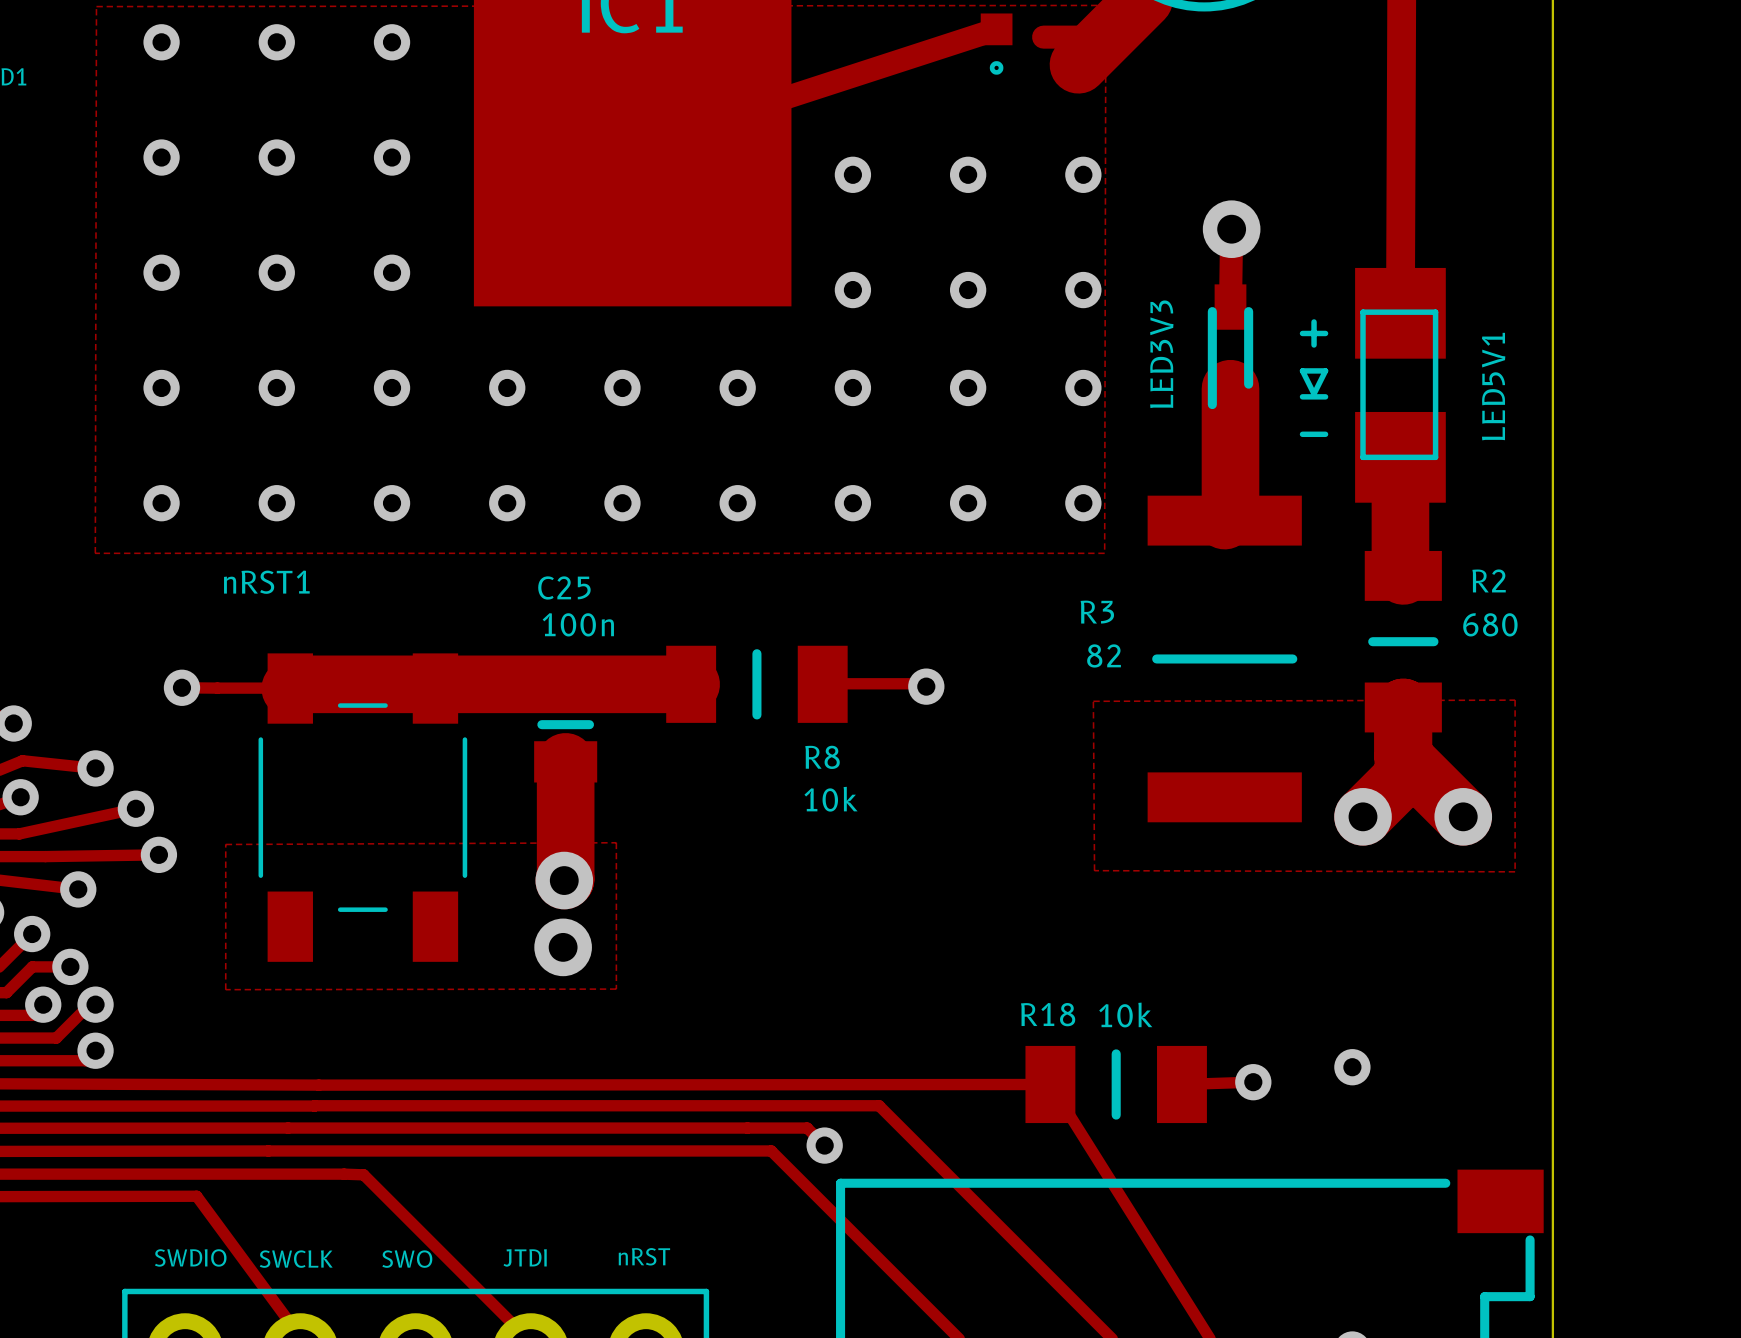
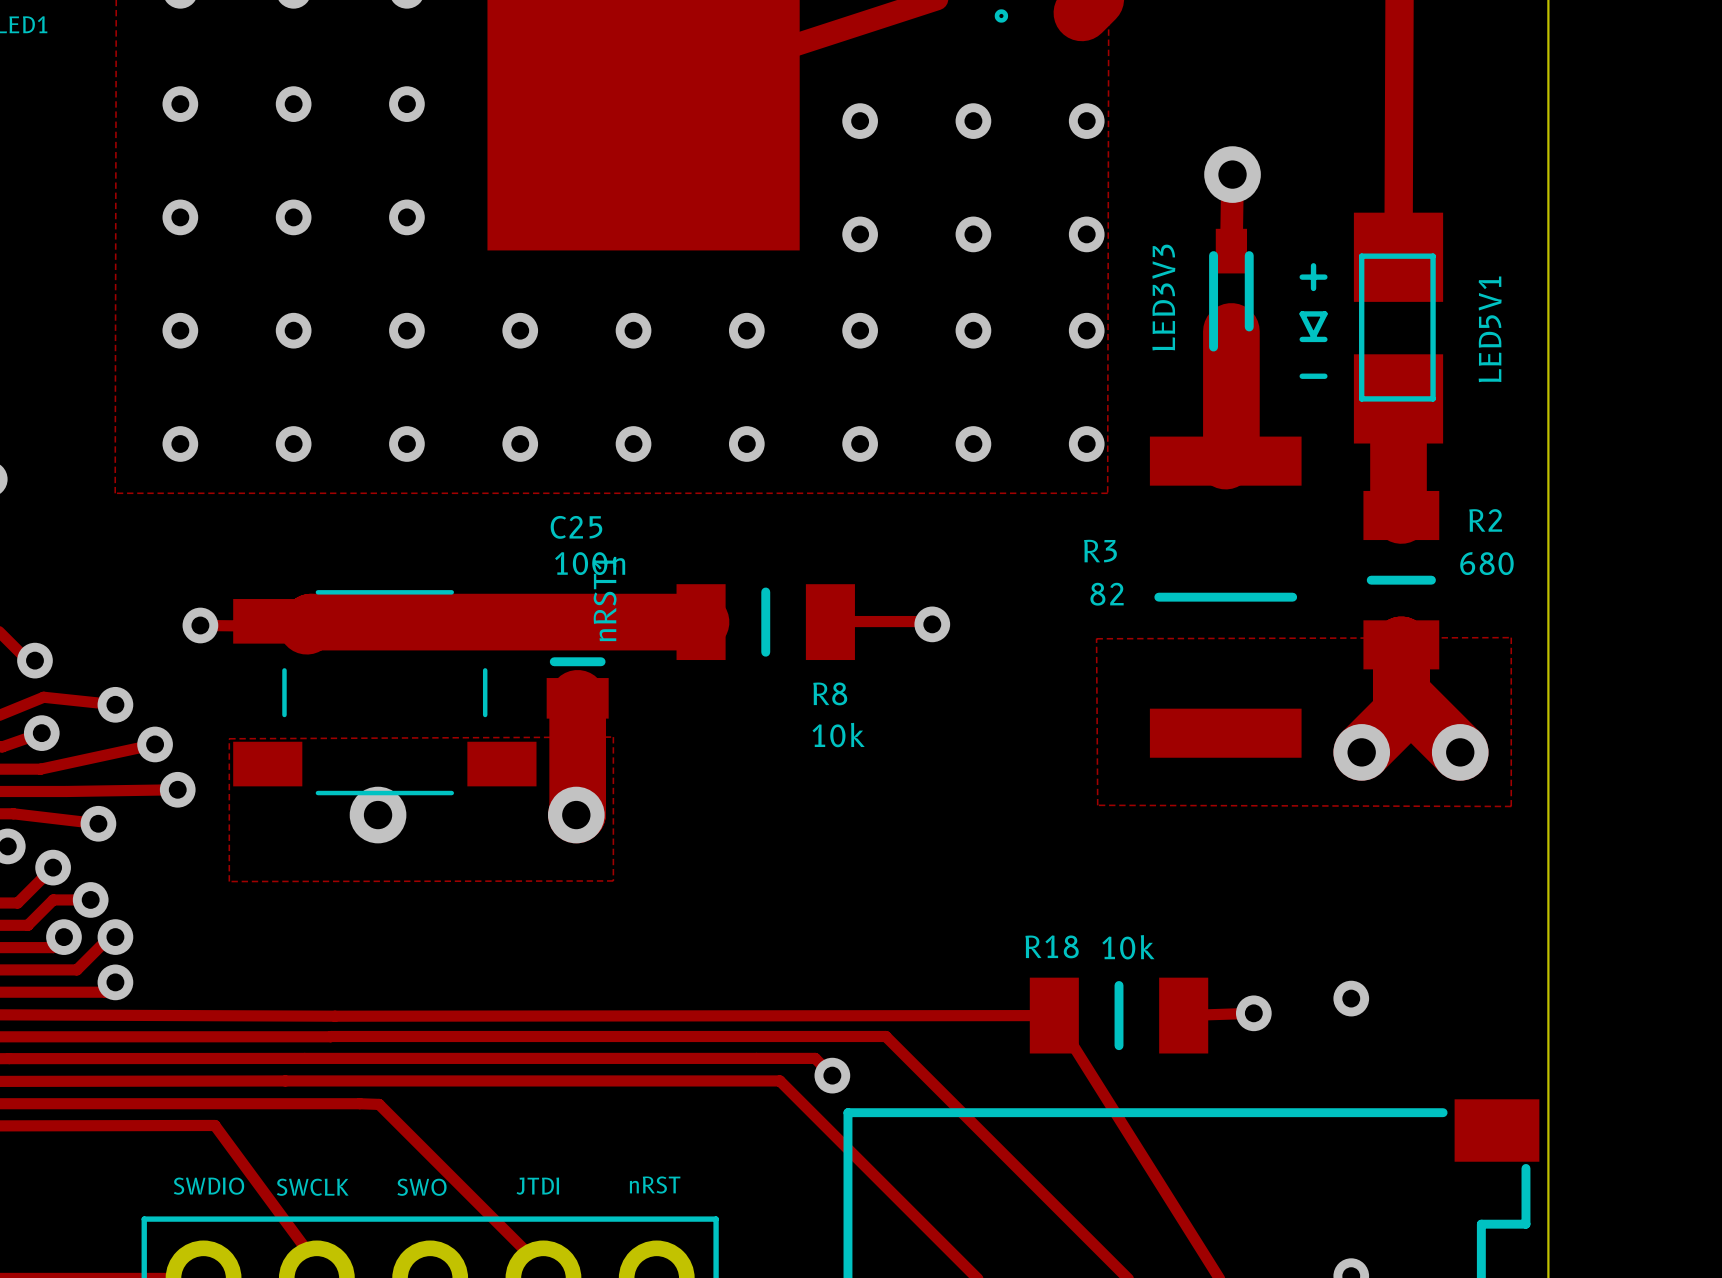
nRST1 rotation: 0° (362, 807) -> 90° clockwise (384, 692)
zone outline: (616, 842) (225, 844) (225, 989) (616, 989) (616, 842) -> (613, 737) (229, 738) (229, 881) (613, 880) (613, 737)
via position: (563, 947) -> (378, 815)

